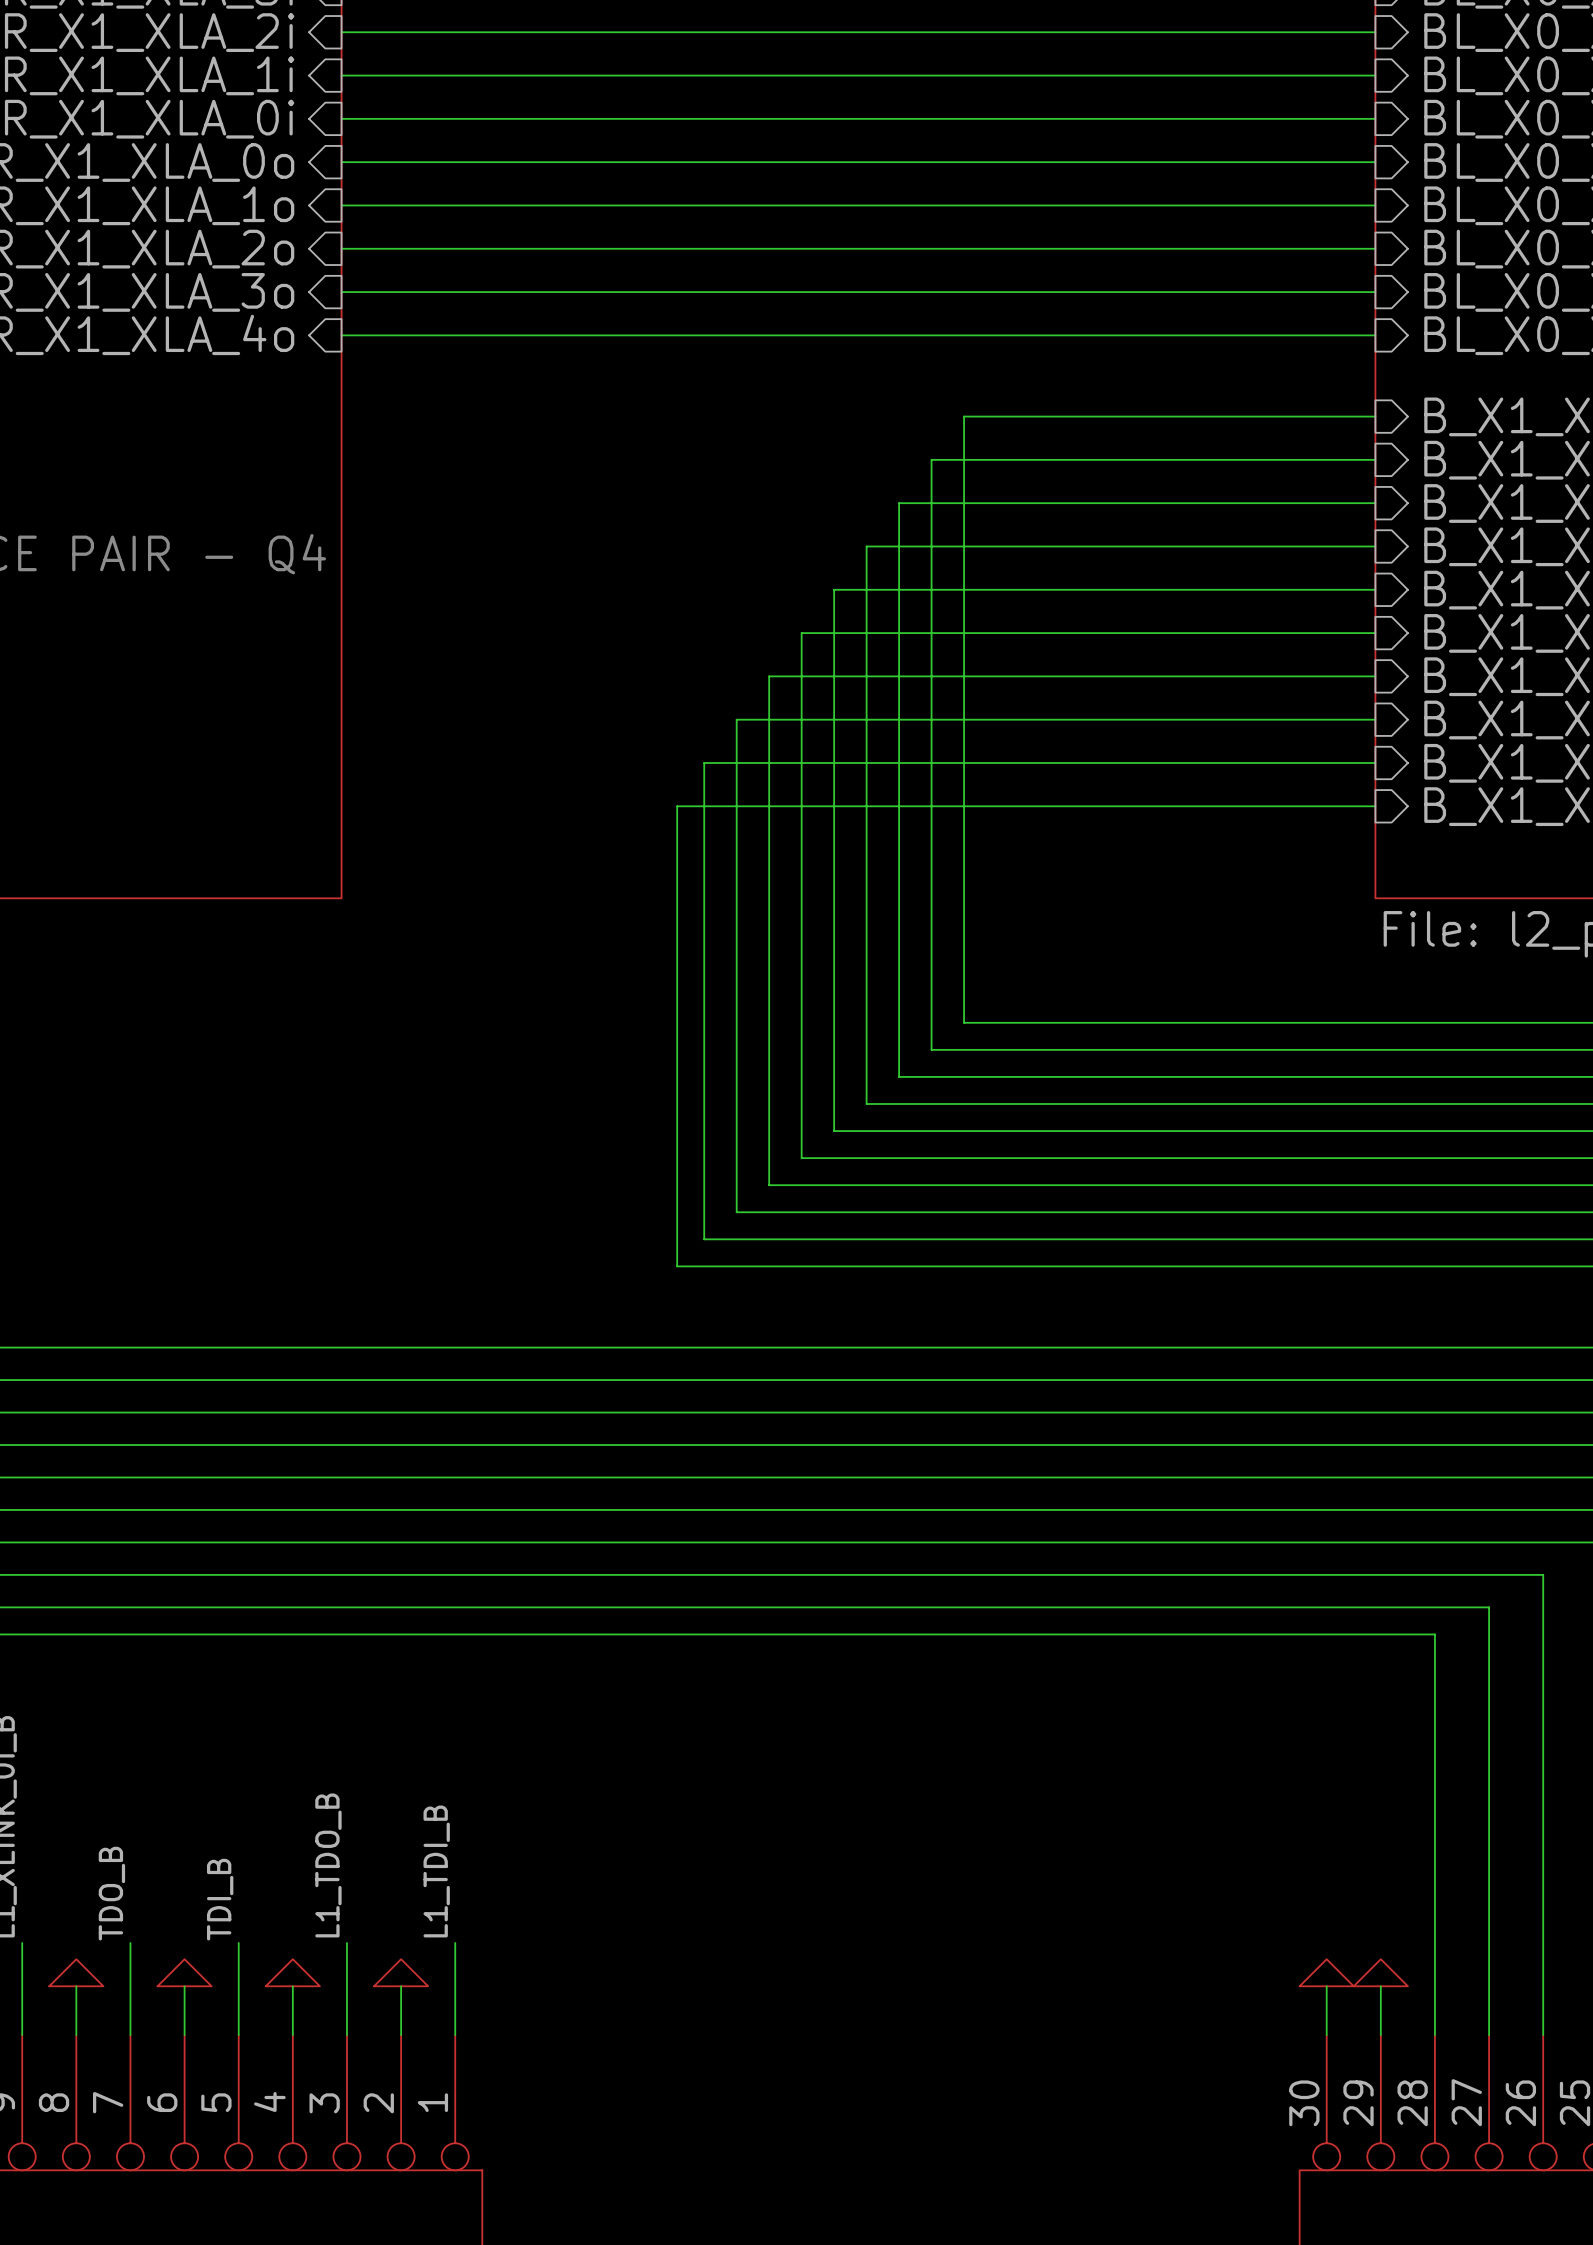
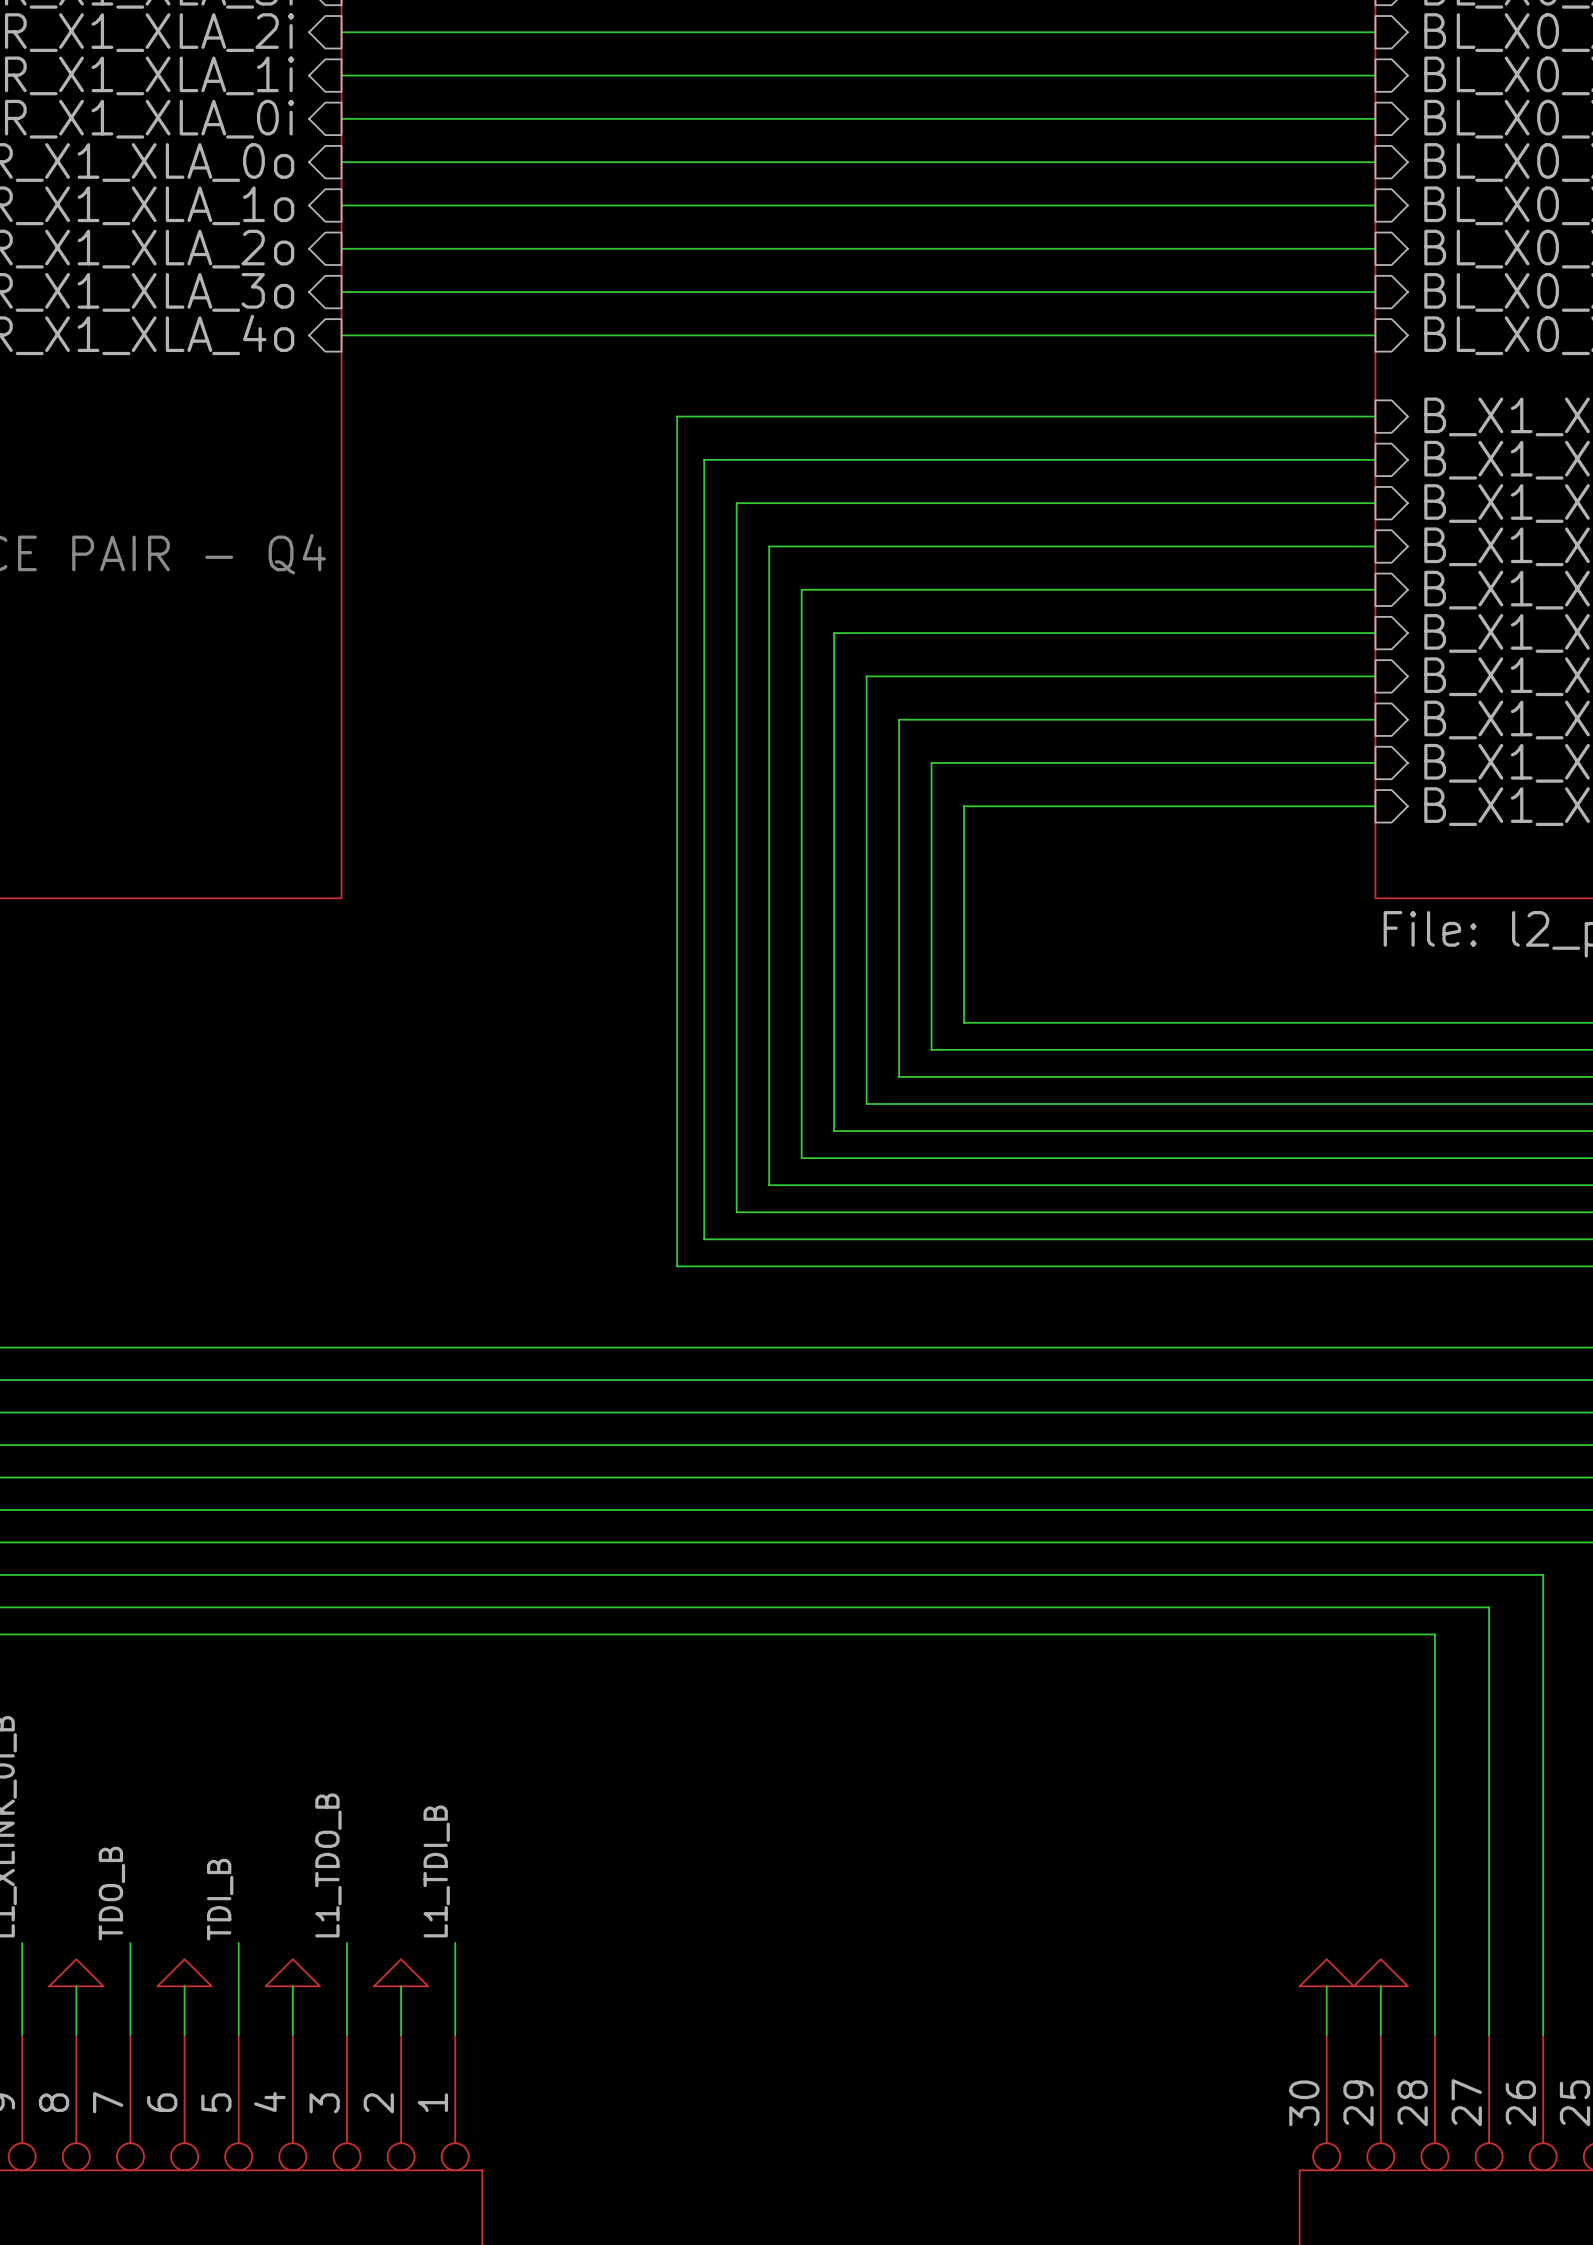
wire: (964, 416) (964, 806) (677, 806) -> (964, 416) (677, 416) (677, 806)
wire: (931, 459) (931, 762) (704, 762) -> (931, 459) (704, 459) (704, 762)
wire: (899, 503) (899, 719) (736, 719) -> (899, 503) (736, 503) (736, 719)
wire: (866, 546) (866, 676) (769, 676) -> (866, 546) (769, 546) (769, 676)
wire: (834, 589) (834, 633) (801, 633) -> (834, 589) (801, 589) (801, 633)

